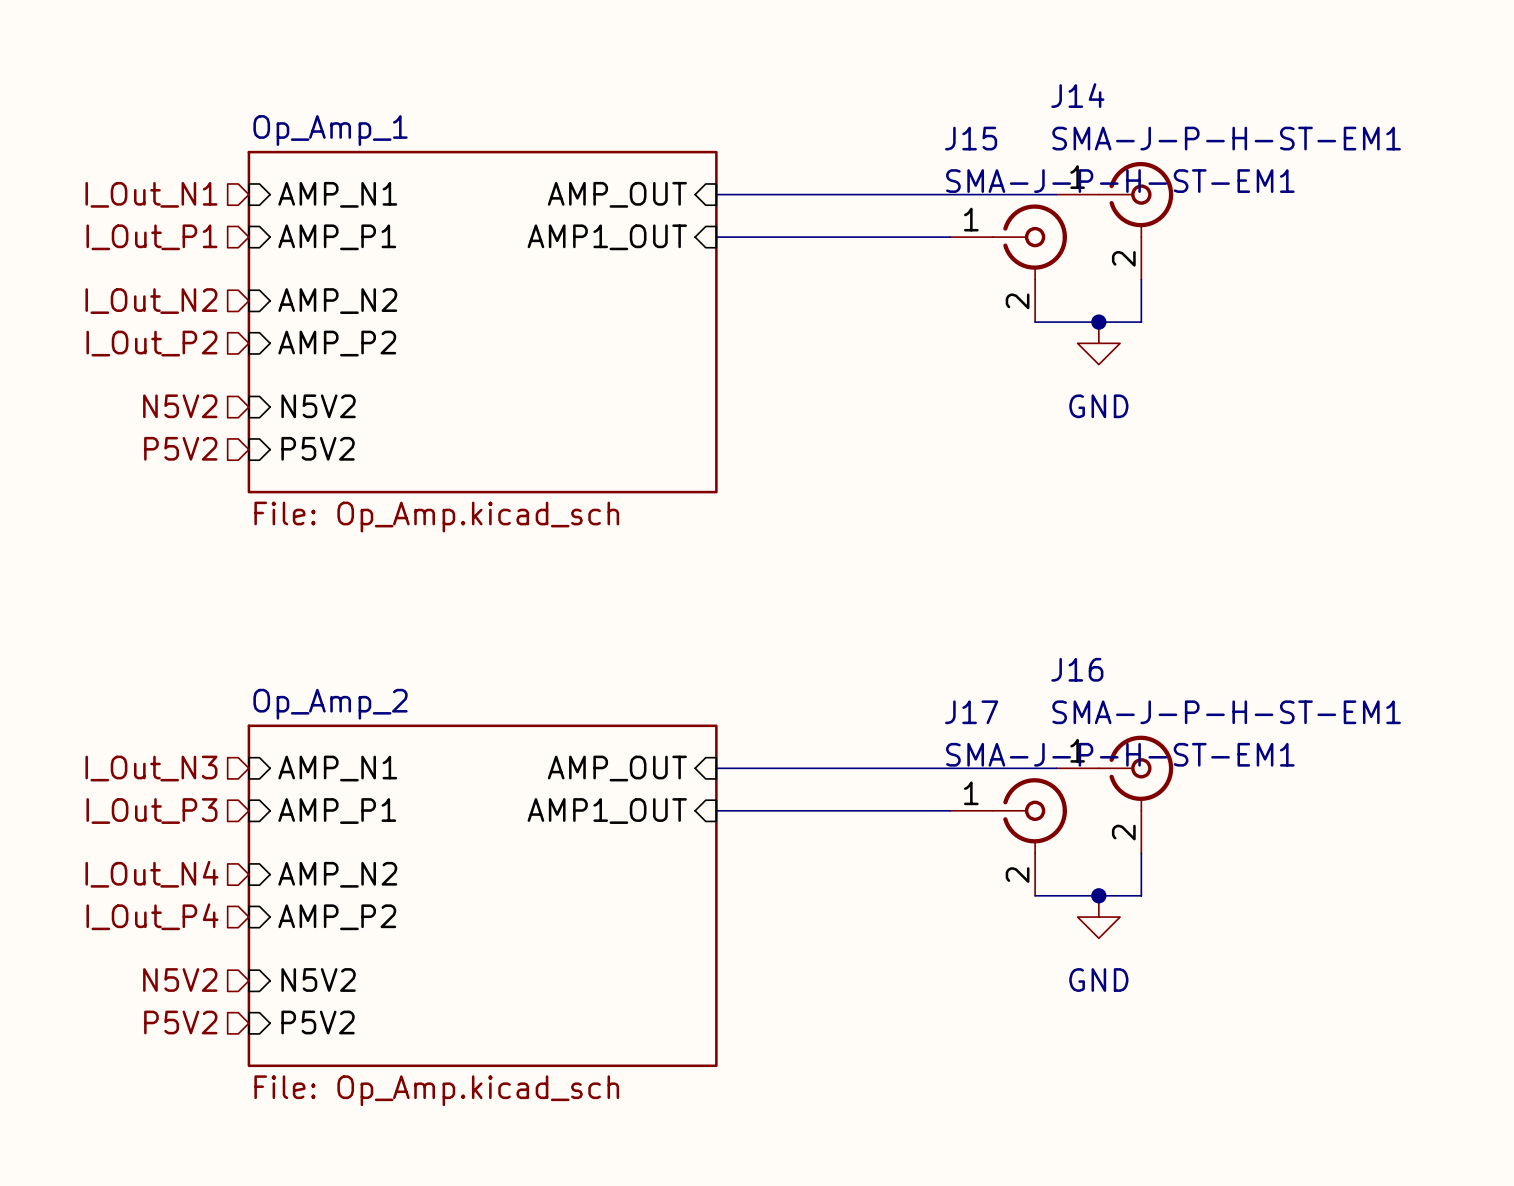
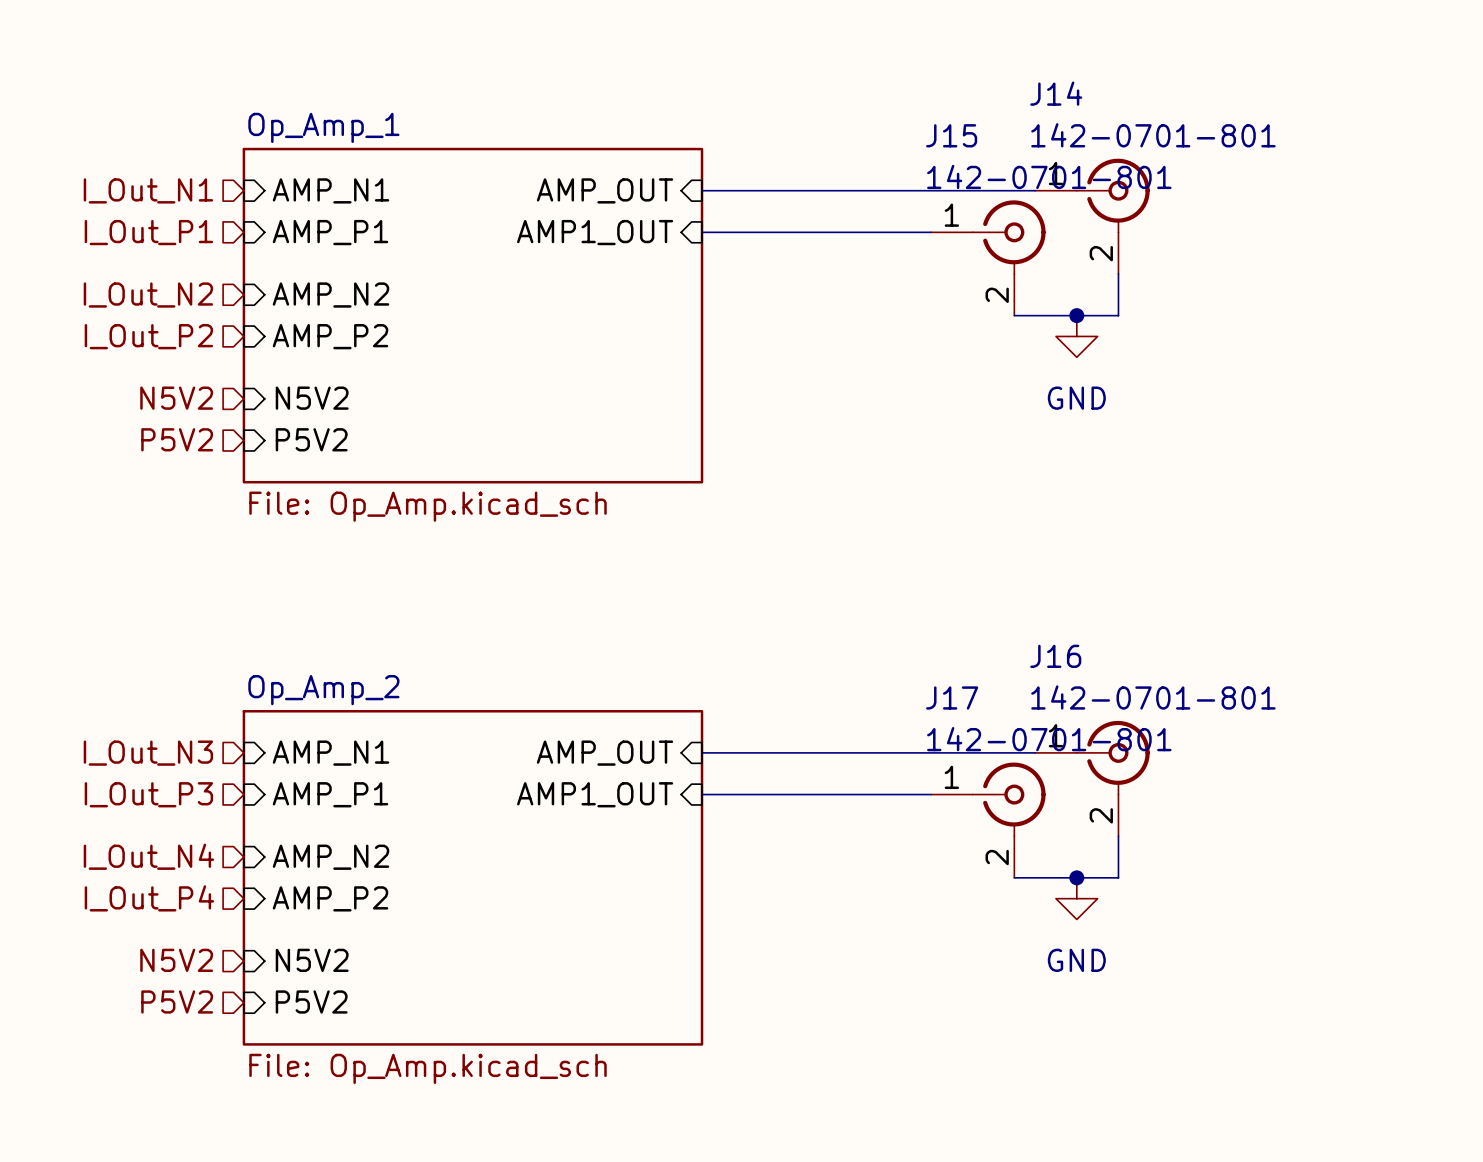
J14 value: SMA-J-P-H-ST-EM1 (1226, 138) -> 142-0701-801 (1153, 135)
J15 value: SMA-J-P-H-ST-EM1 (1120, 181) -> 142-0701-801 (1049, 176)
J16 value: SMA-J-P-H-ST-EM1 (1226, 712) -> 142-0701-801 (1153, 697)
J17 value: SMA-J-P-H-ST-EM1 (1120, 754) -> 142-0701-801 (1049, 739)

